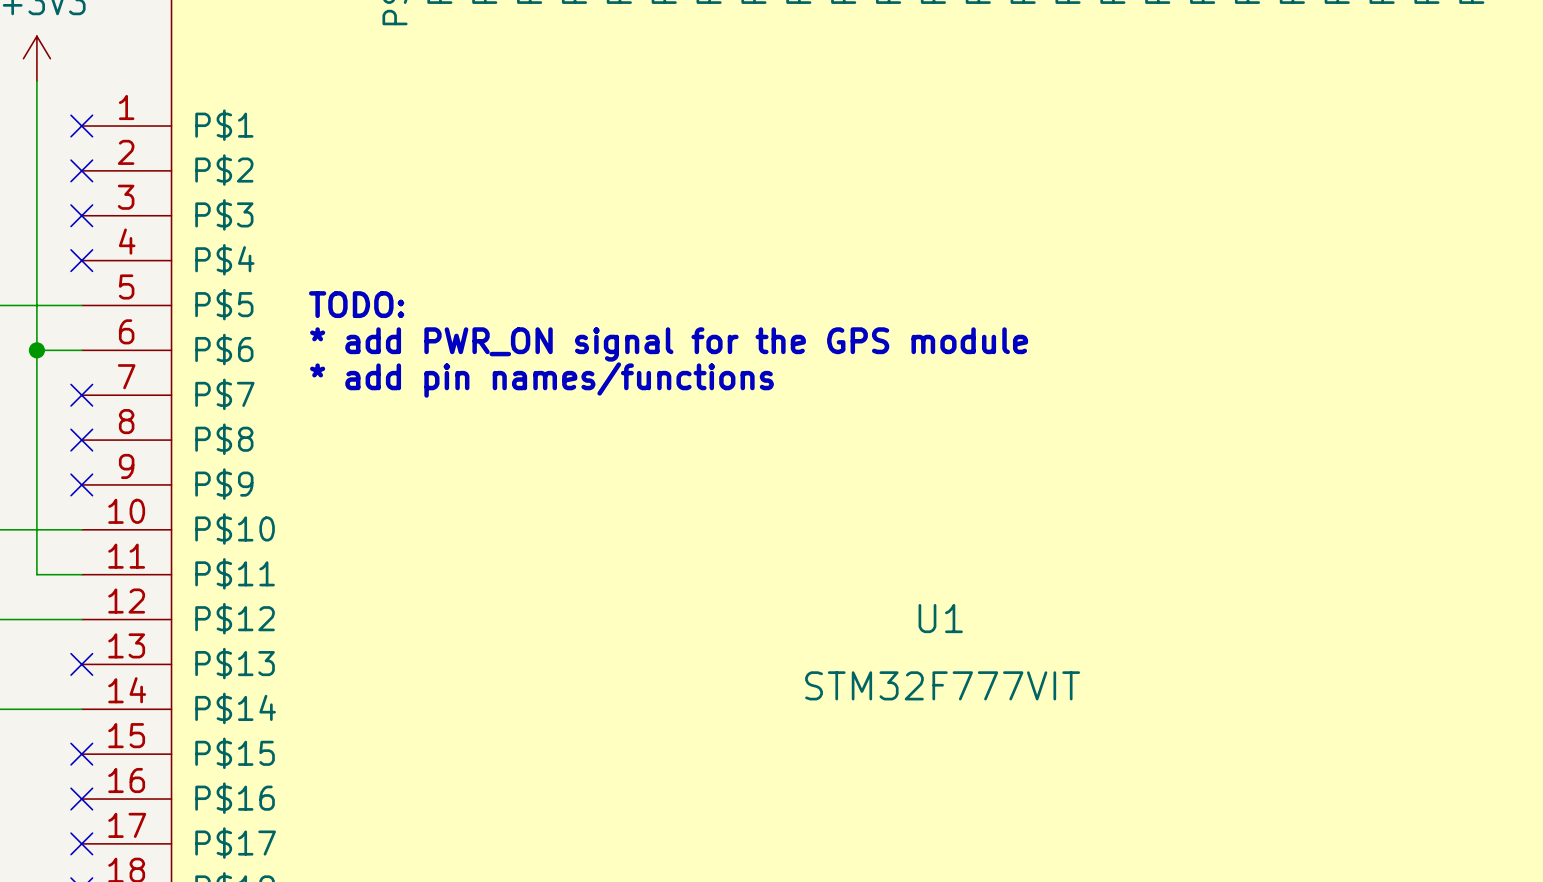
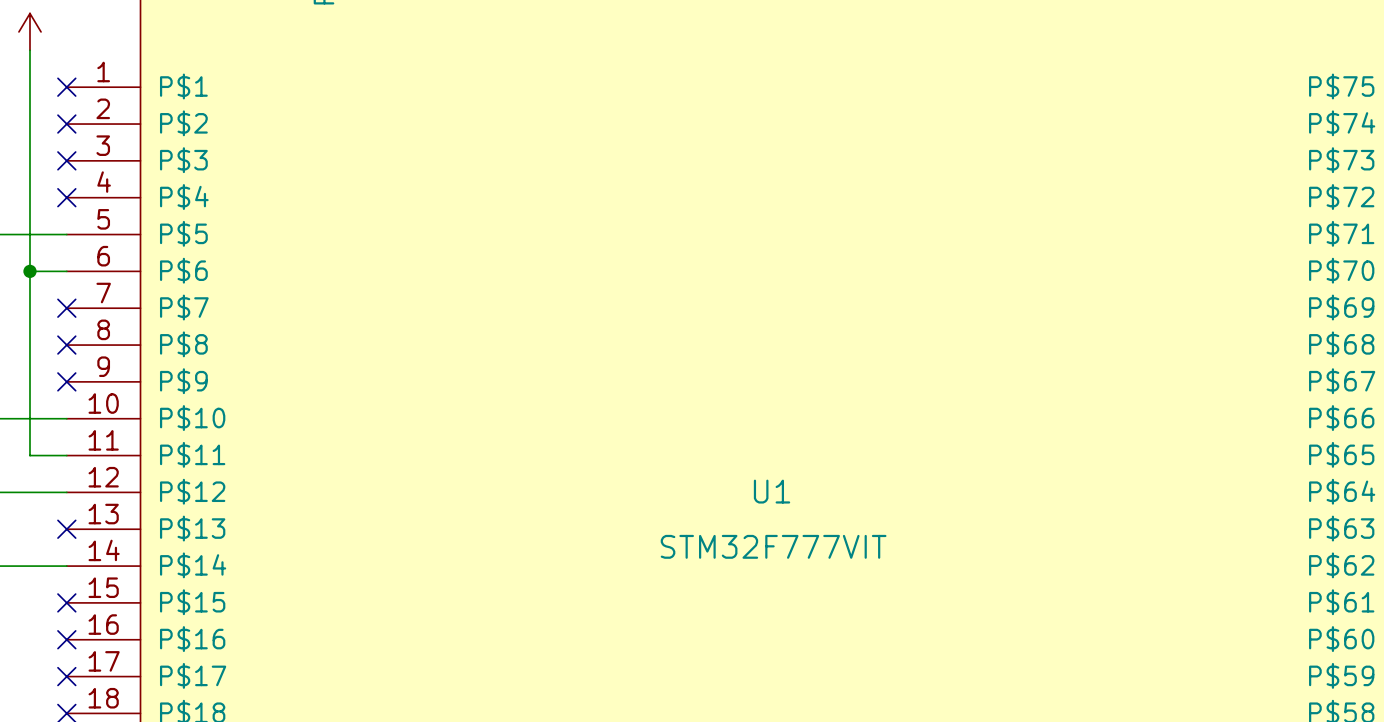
text: TODO: (356, 304) -> none
text: * add PWR_ON signal for the GPS module (669, 344) -> none
text: * add pin names/functions (541, 380) -> none

